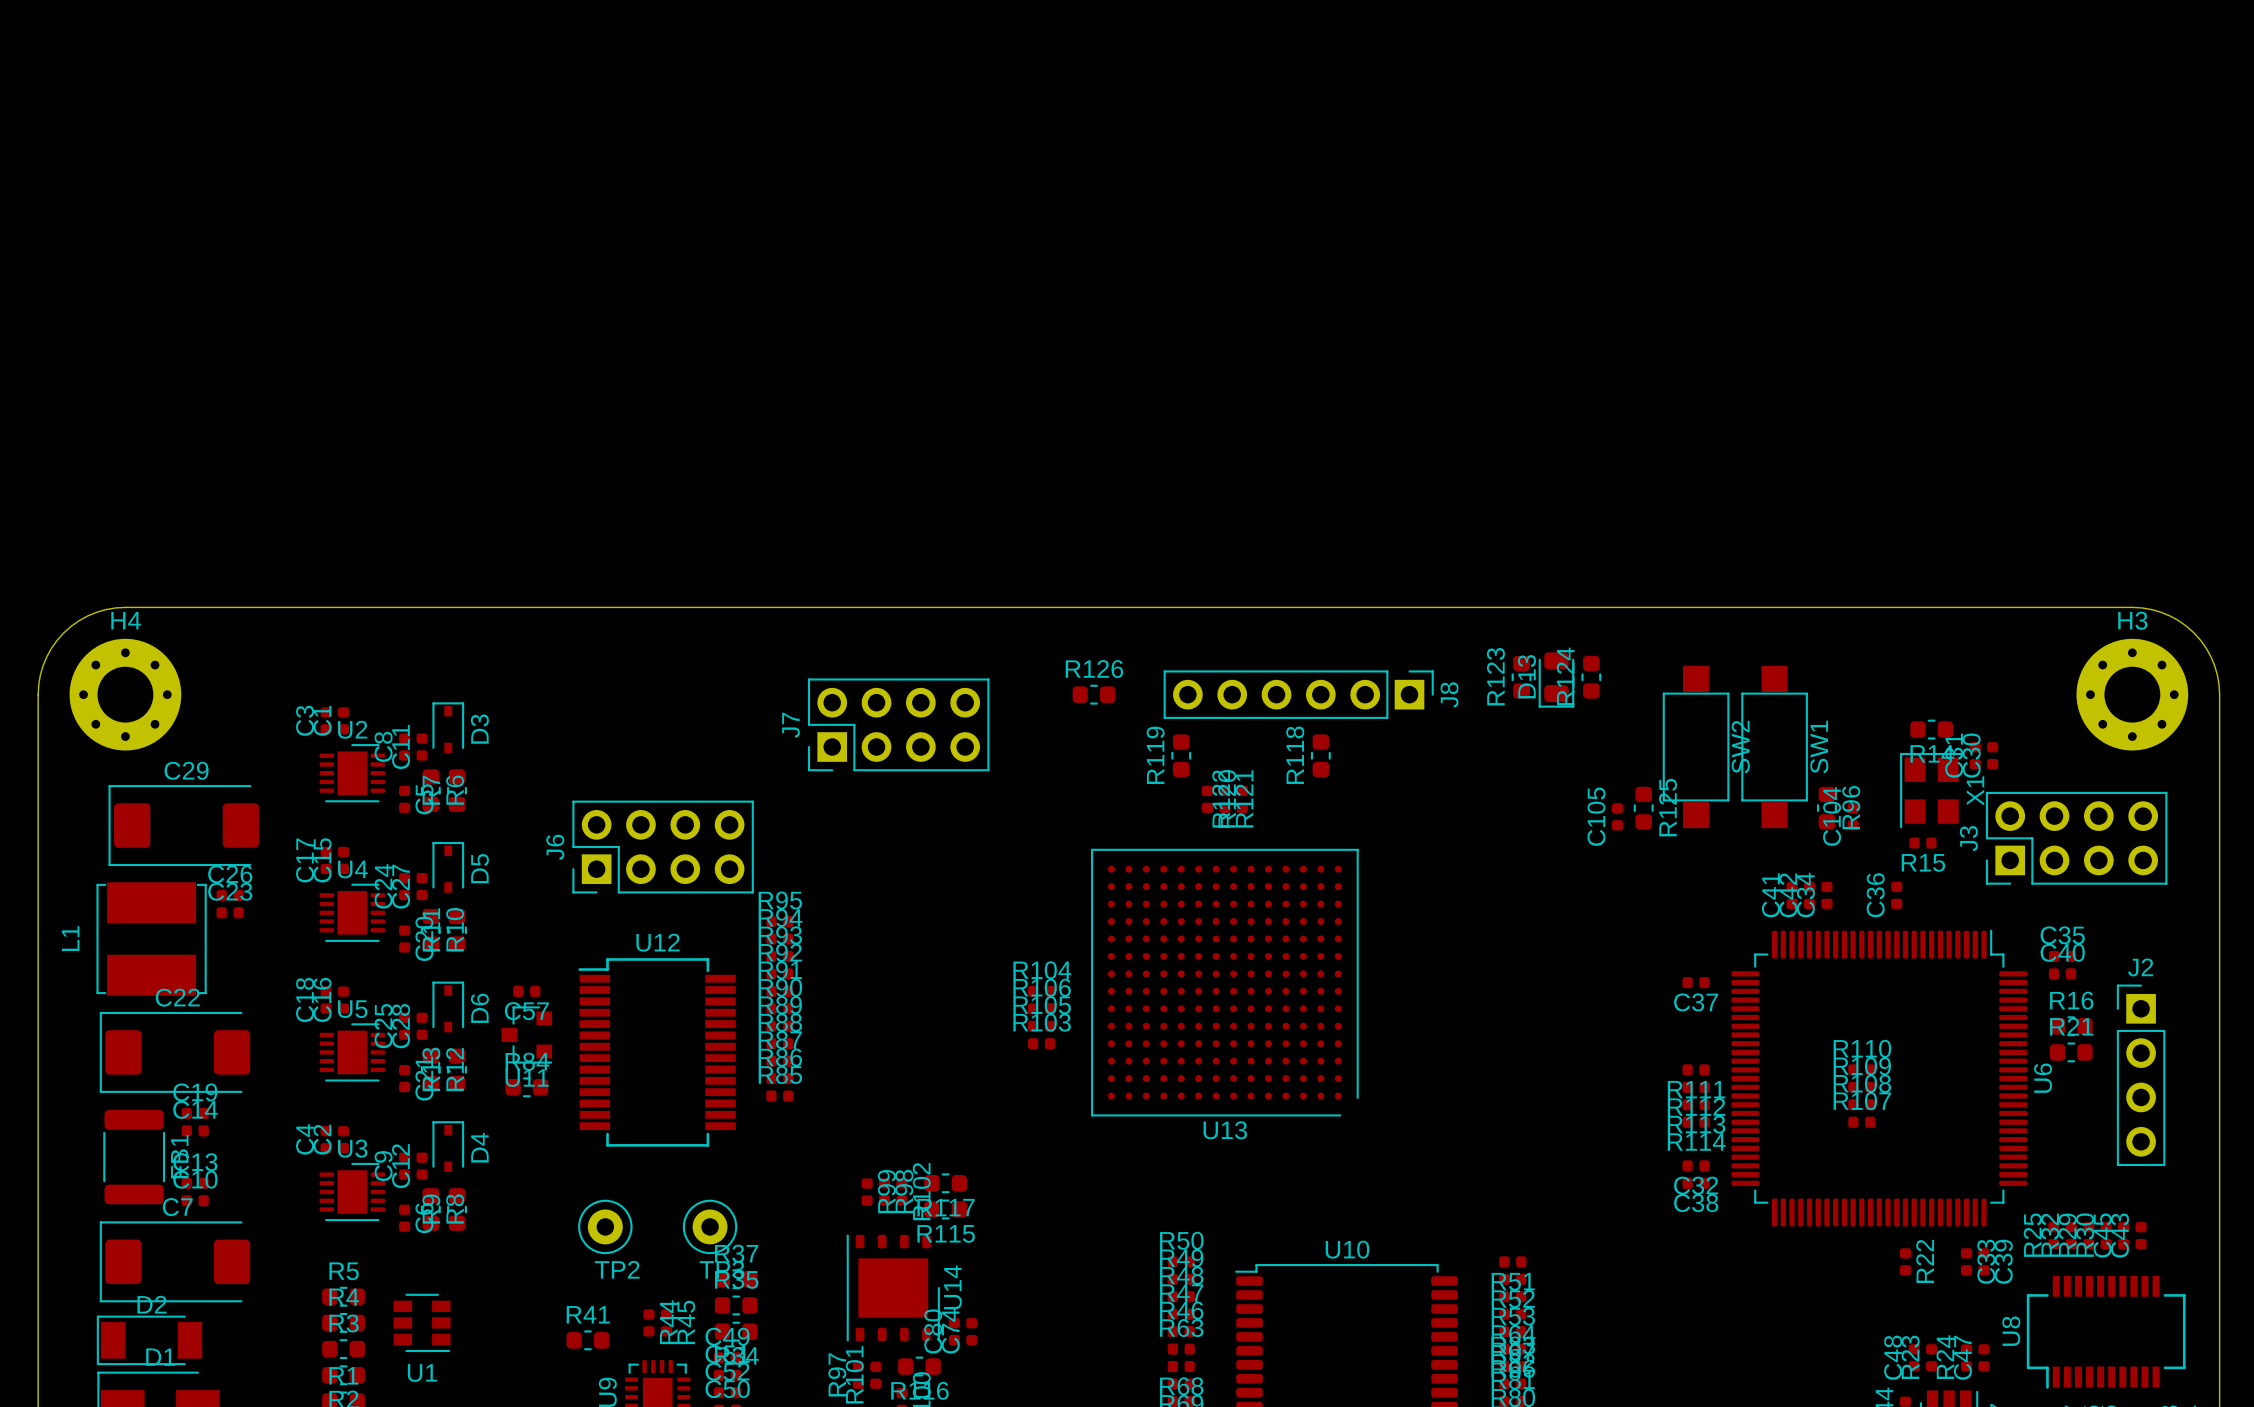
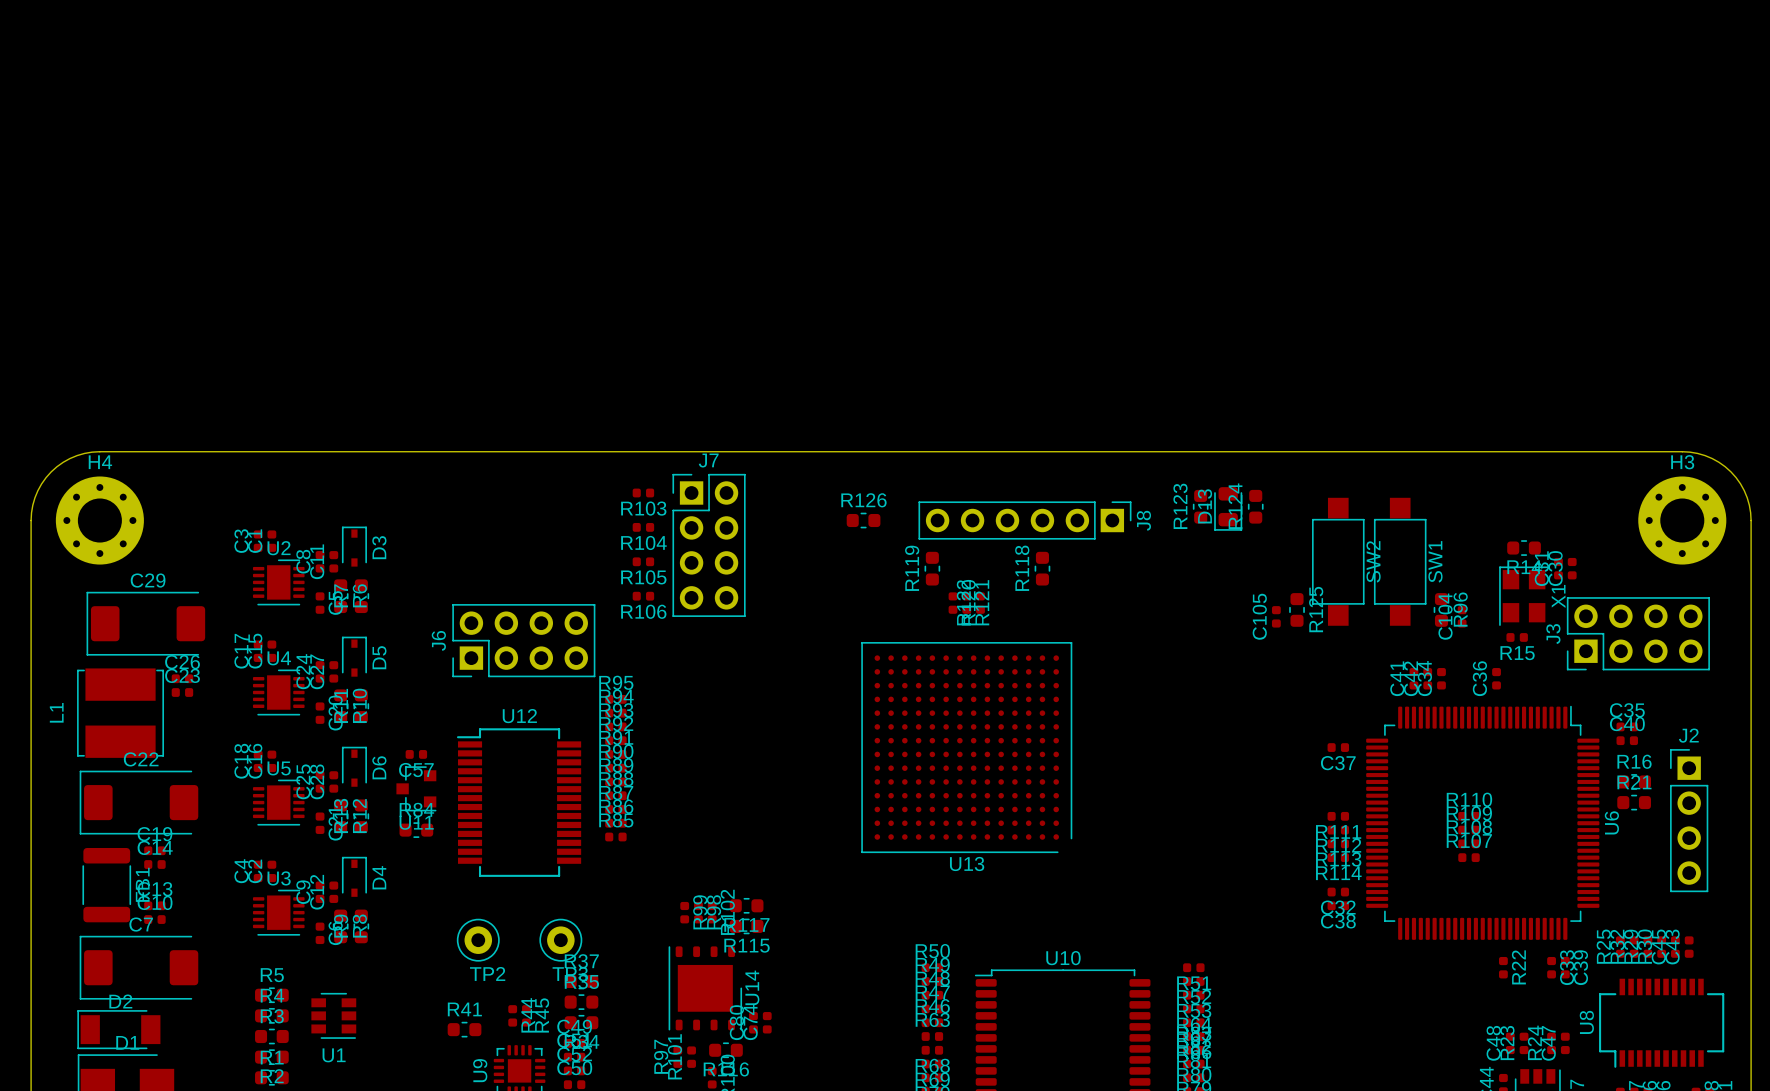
J7 rotation: 0° (898, 724) -> 90° clockwise (709, 545)
R104 name position: R104 (1042, 970) -> R104 (643, 542)
R106 name position: R106 (1042, 987) -> R106 (643, 611)
R104 position: (1041, 991) -> (643, 527)
R105 name position: R105 (1042, 1005) -> R105 (643, 577)
R106 position: (1041, 1008) -> (643, 596)
R103 name position: R103 (1042, 1022) -> R103 (643, 508)
R105 position: (1041, 1026) -> (643, 561)
R103 position: (1041, 1043) -> (643, 492)

